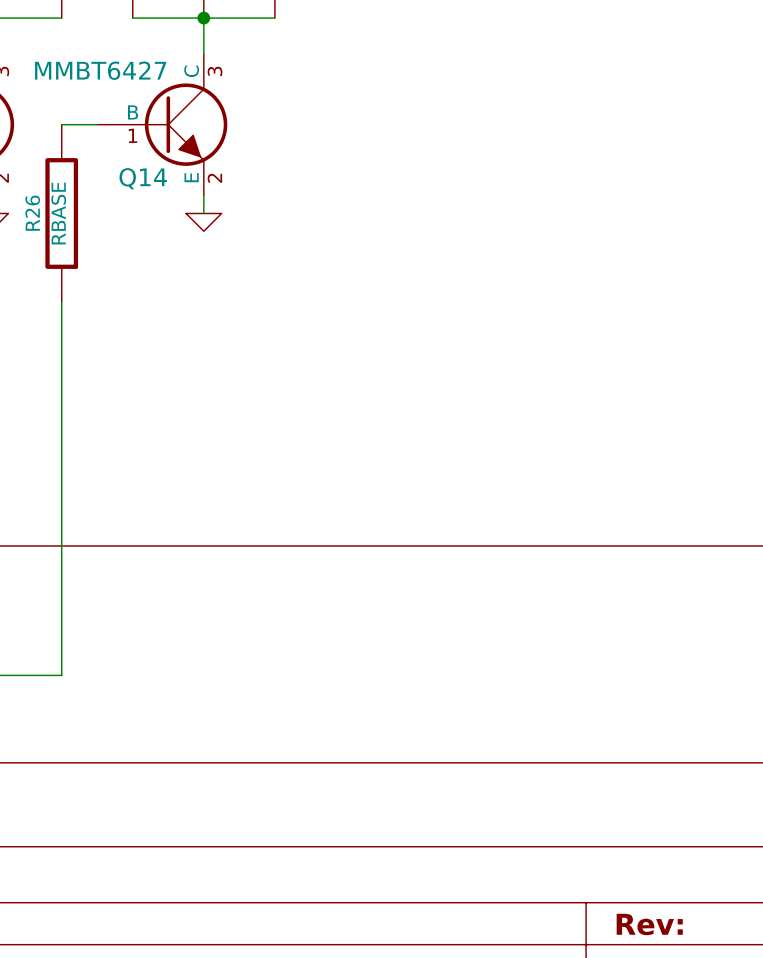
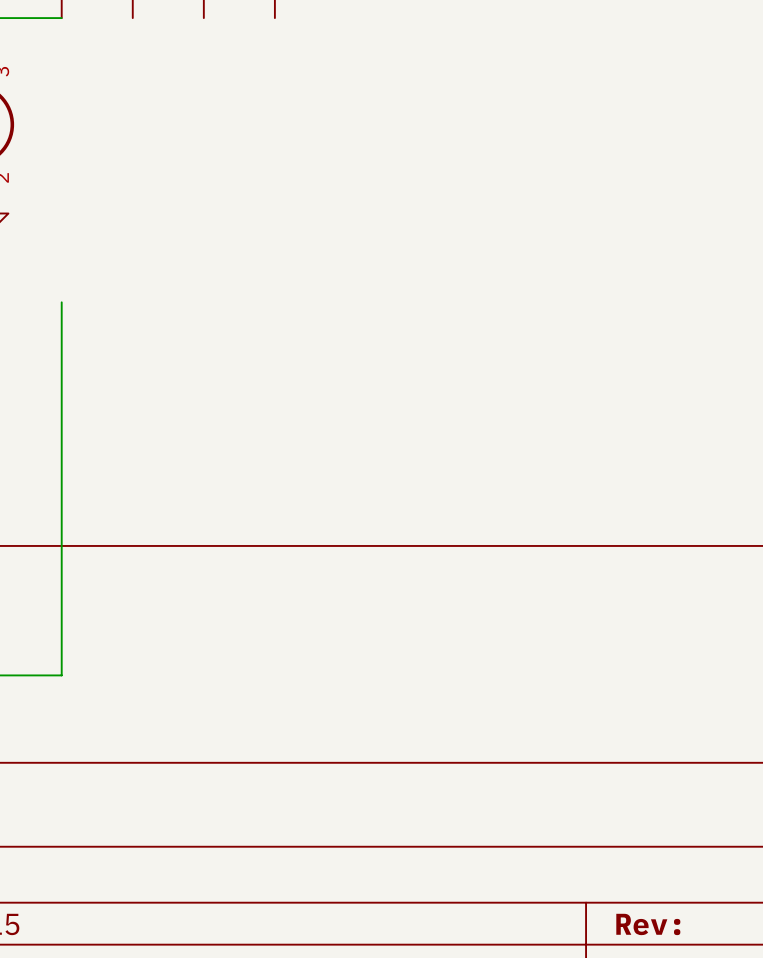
wire: (132, 18) (274, 18) -> none
wire: (203, 18) (203, 53) -> none
junction: (203, 18) -> none
wire: (61, 124) (97, 124) -> none
Q14: MMBT6427 (162, 124) -> none
wire: (203, 195) (203, 213) -> none
R26: RBASE (61, 213) -> none
power symbol: (203, 222) -> none

